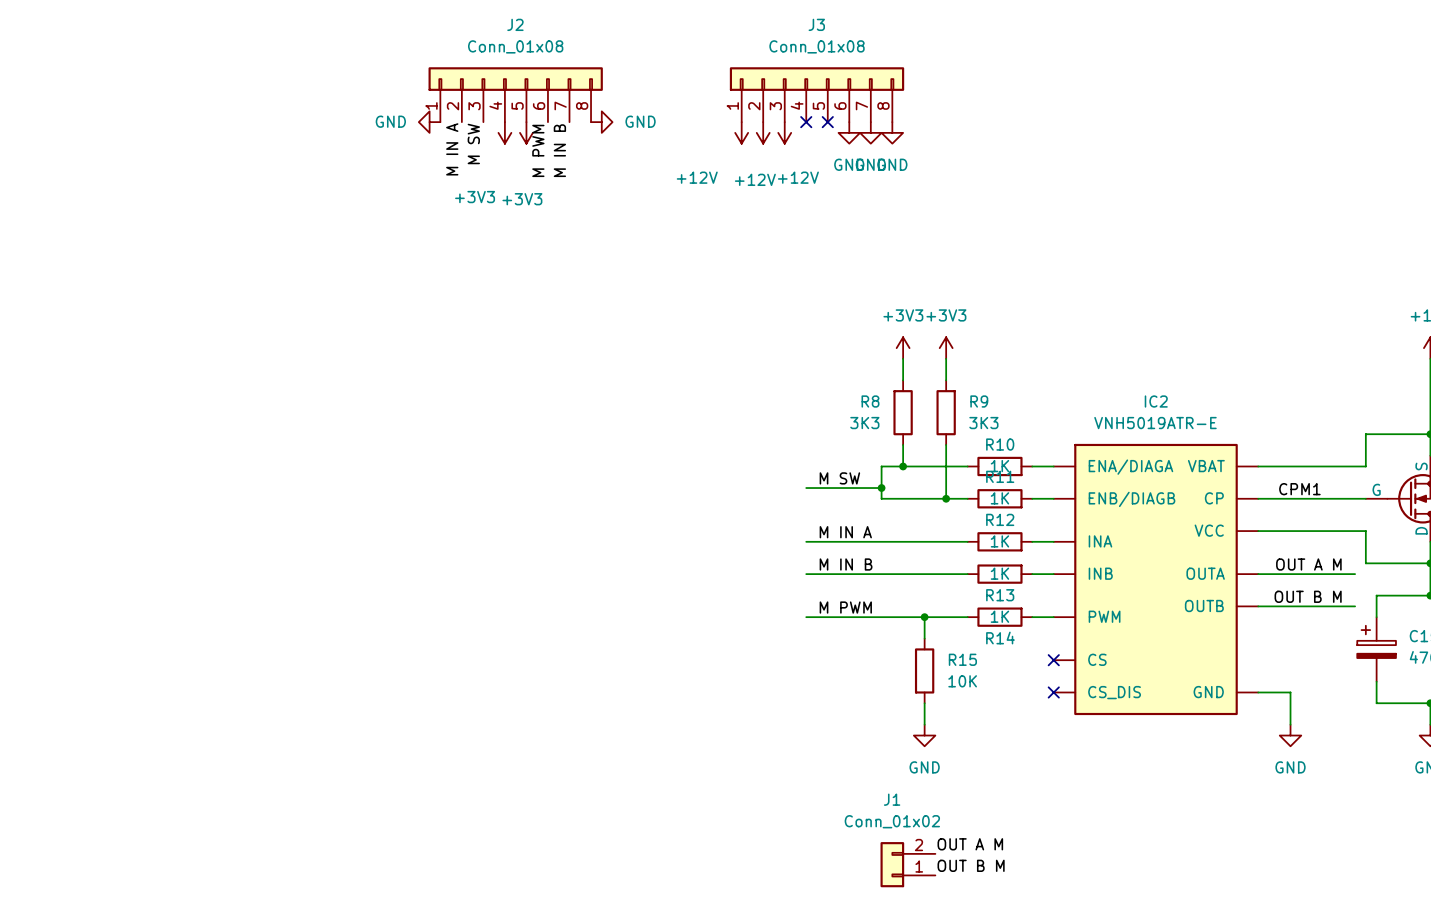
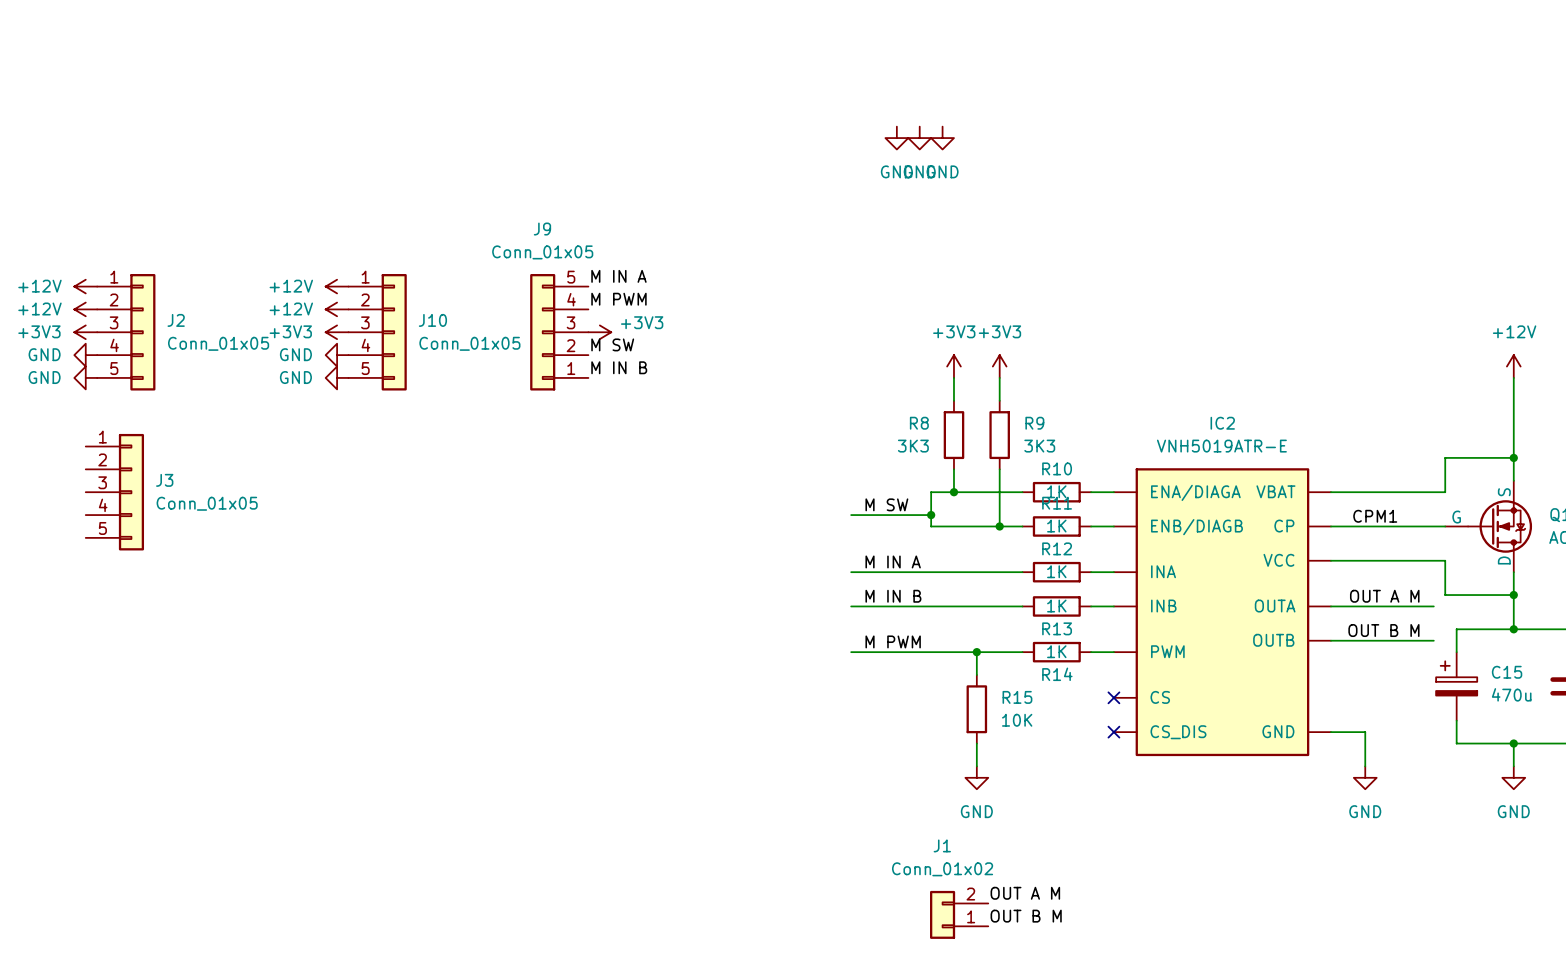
J2 name position: J2 (515, 24) -> J2 (176, 320)
J3 name position: J3 (816, 24) -> J3 (164, 480)
J2 value: Conn_01x08 (515, 46) -> Conn_01x05 (218, 343)
J3 value: Conn_01x08 (817, 46) -> Conn_01x05 (207, 503)
J2 symbol: [428, 67, 603, 123] -> [97, 274, 156, 391]
J3 symbol: [729, 67, 905, 123] -> [85, 433, 145, 551]
power symbol: GND (429, 122) -> none
power symbol: GND (601, 122) -> none
no-connect mark: (806, 122) -> none
no-connect mark: (827, 122) -> none
power symbol: +3V3 (504, 132) -> none
power symbol: +3V3 (526, 132) -> none
power symbol: +12V (741, 132) -> none
power symbol: +12V (763, 132) -> none
power symbol: +12V (784, 132) -> none
label: M SW (473, 143) -> none
label rotation: 0° (452, 149) -> 90° clockwise (618, 276)
label position: M IN A (452, 149) -> M IN A (618, 276)
label rotation: 0° (538, 150) -> 90° clockwise (618, 299)
label position: M PWM (538, 150) -> M PWM (618, 299)
label: M IN B (559, 150) -> none
power symbol: none -> +12V (85, 286)
power symbol: none -> +12V (337, 286)
power symbol: none -> +12V (85, 309)
power symbol: none -> +12V (337, 309)
power symbol: none -> +3V3 (85, 332)
power symbol: none -> +3V3 (337, 332)
J10: none -> Conn_01x05 (377, 332)
J9: none -> Conn_01x05 (559, 332)
power symbol: none -> +3V3 (599, 332)
label: none -> M SW (612, 344)
power symbol: none -> GND (85, 355)
power symbol: none -> GND (337, 355)
label: none -> M IN B (619, 367)
power symbol: none -> GND (85, 377)
power symbol: none -> GND (337, 377)

